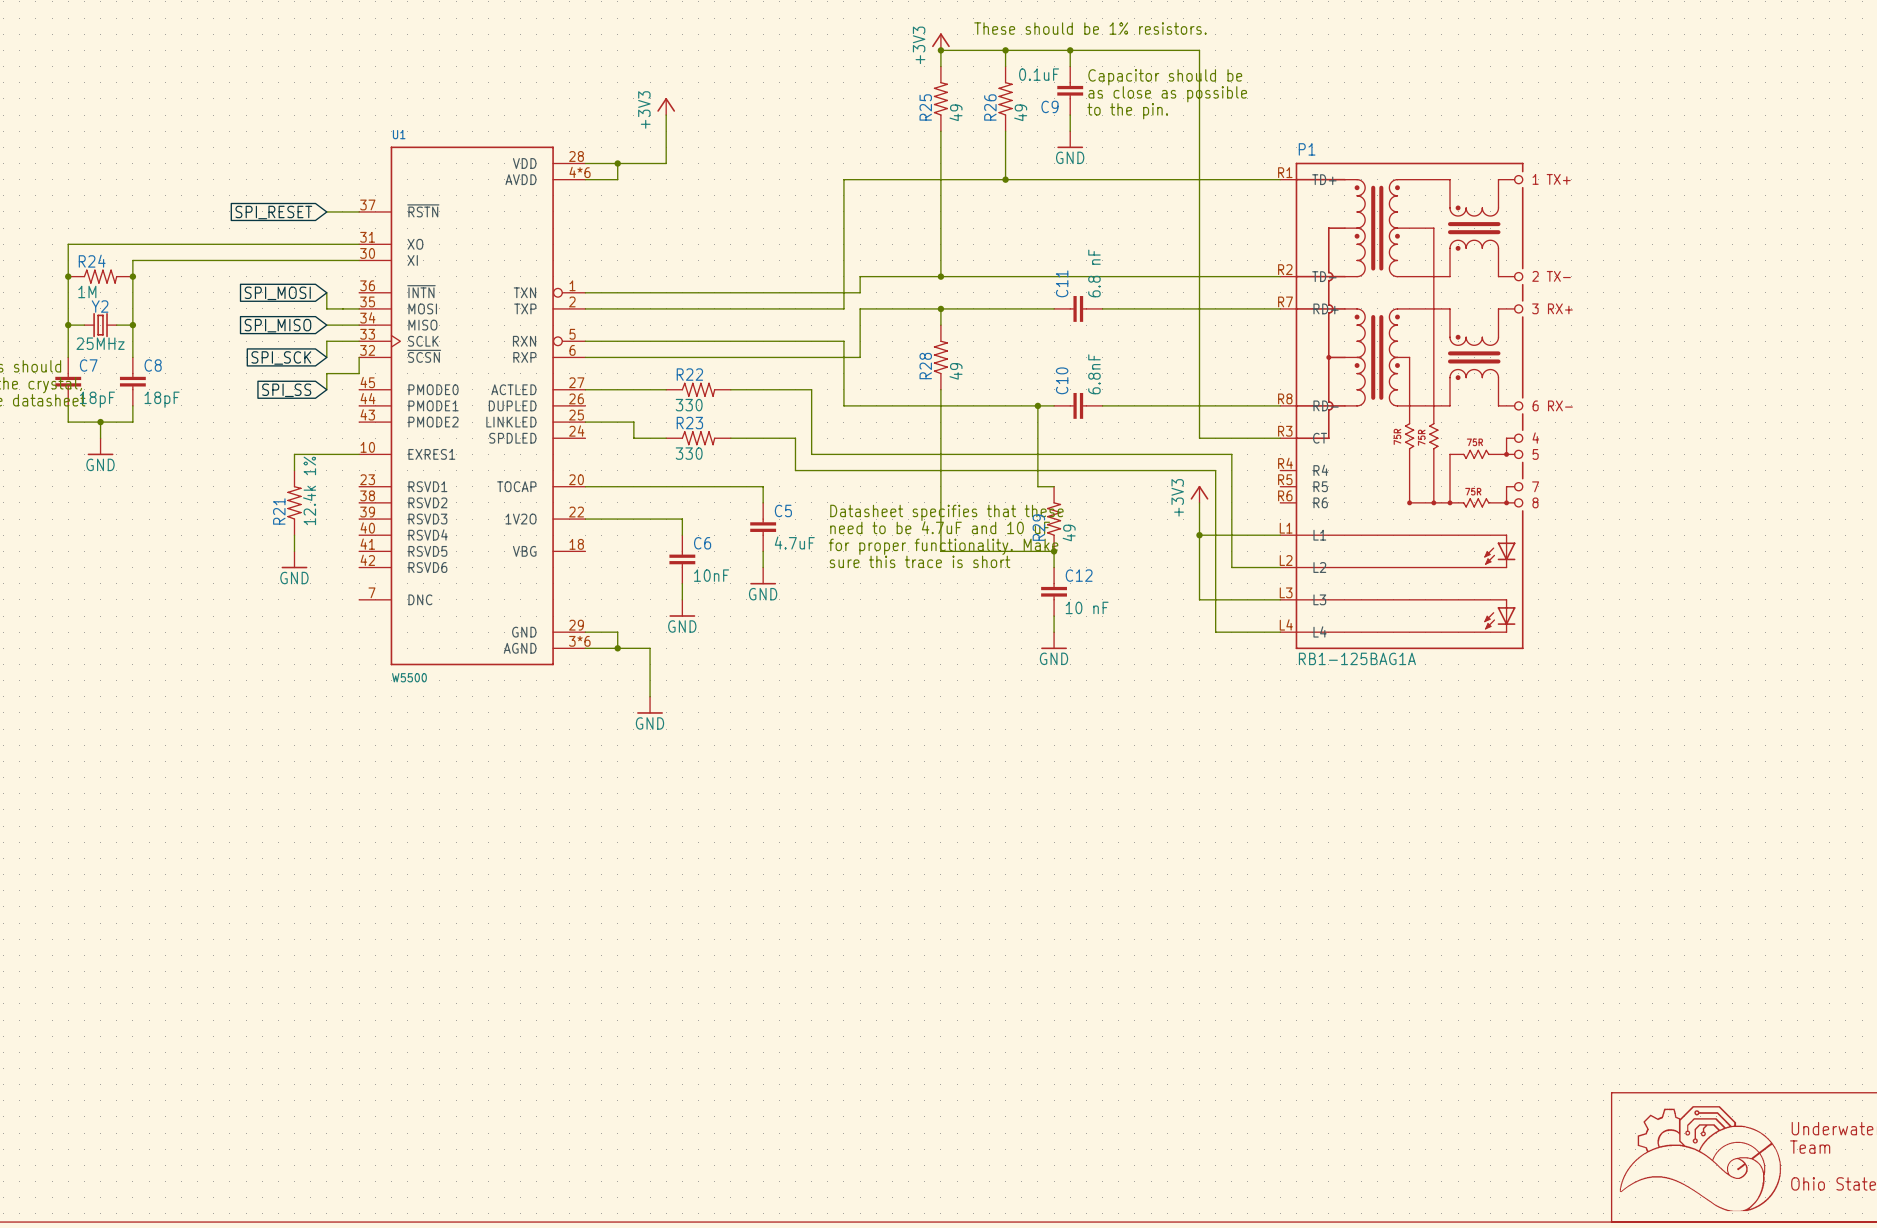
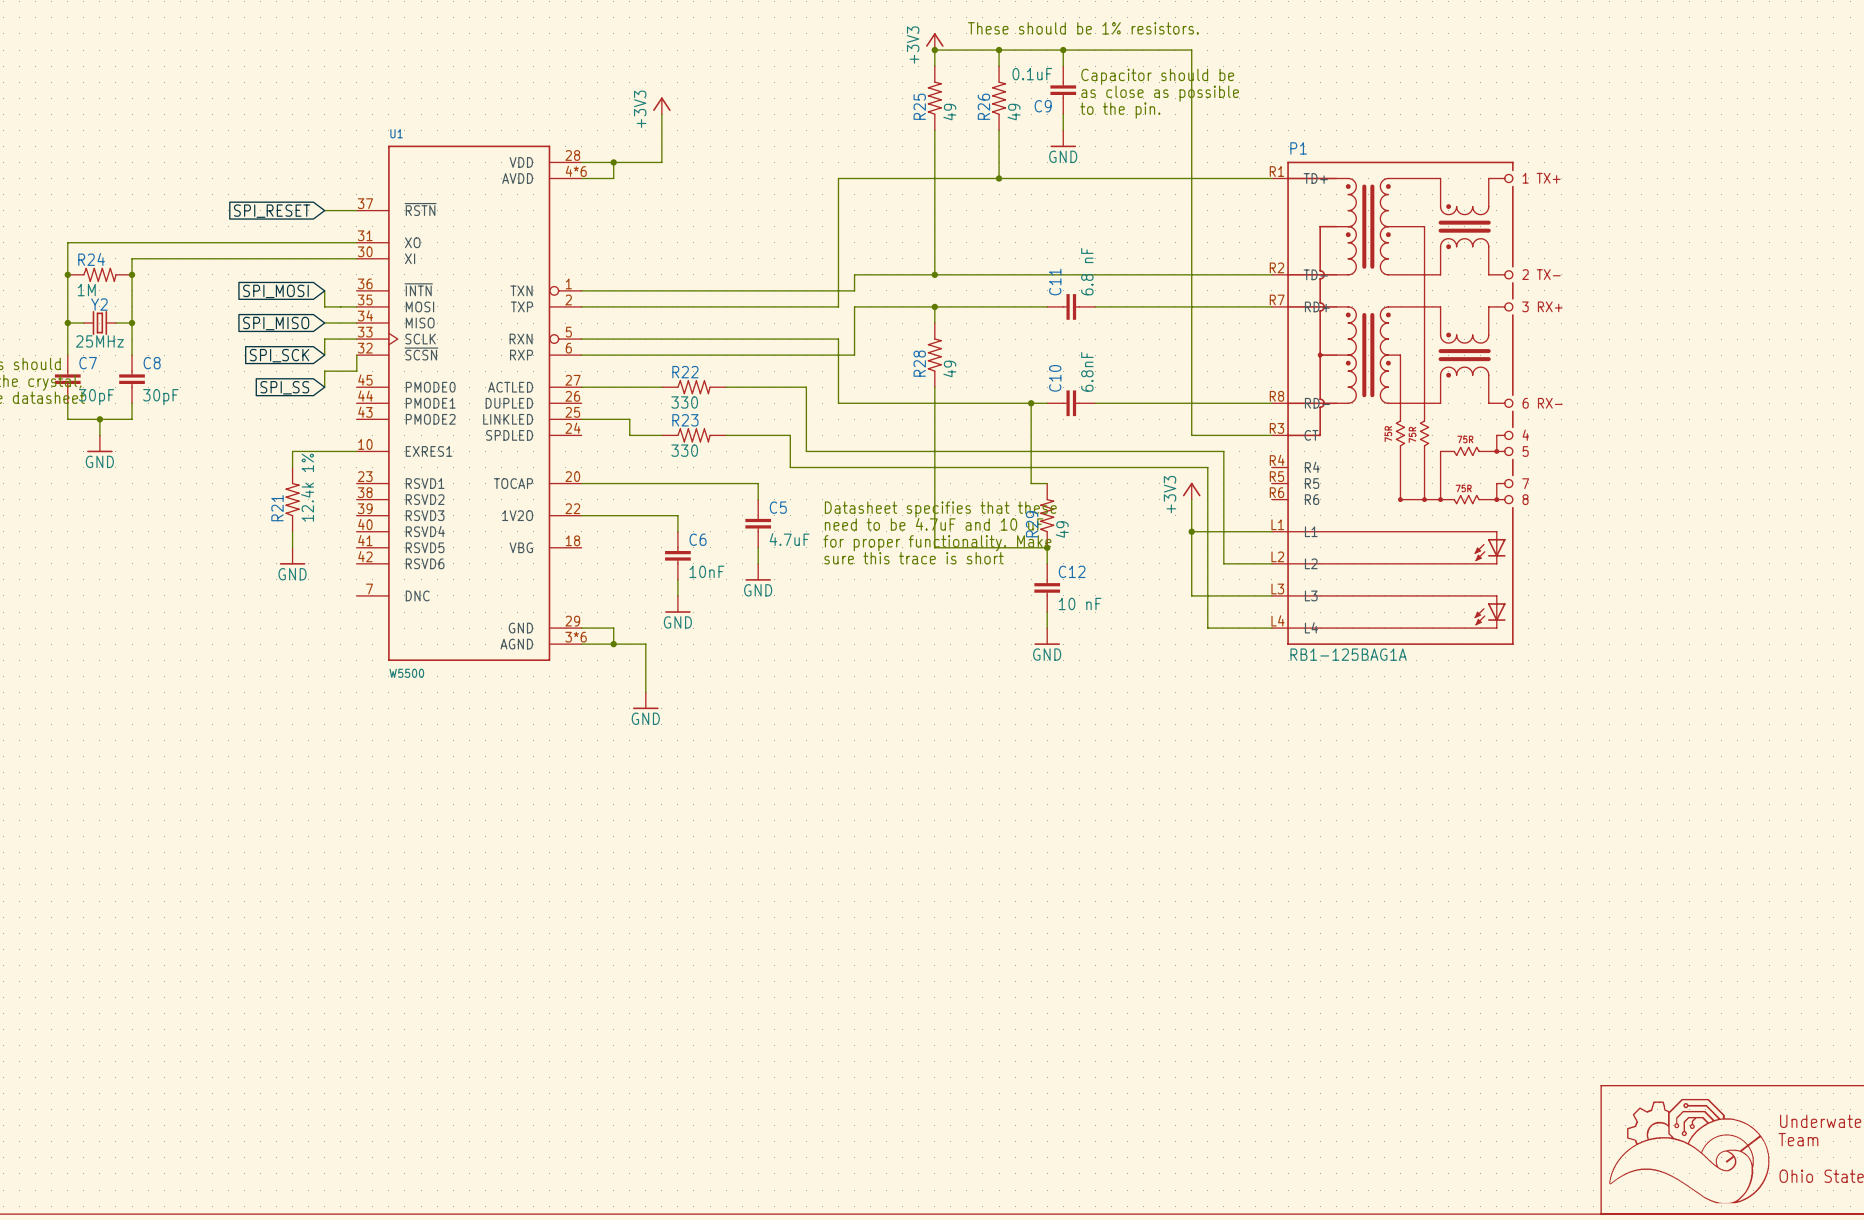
C7 value: 18pF (97, 399) -> 30pF (96, 397)
C8 value: 18pF (162, 399) -> 30pF (160, 397)

